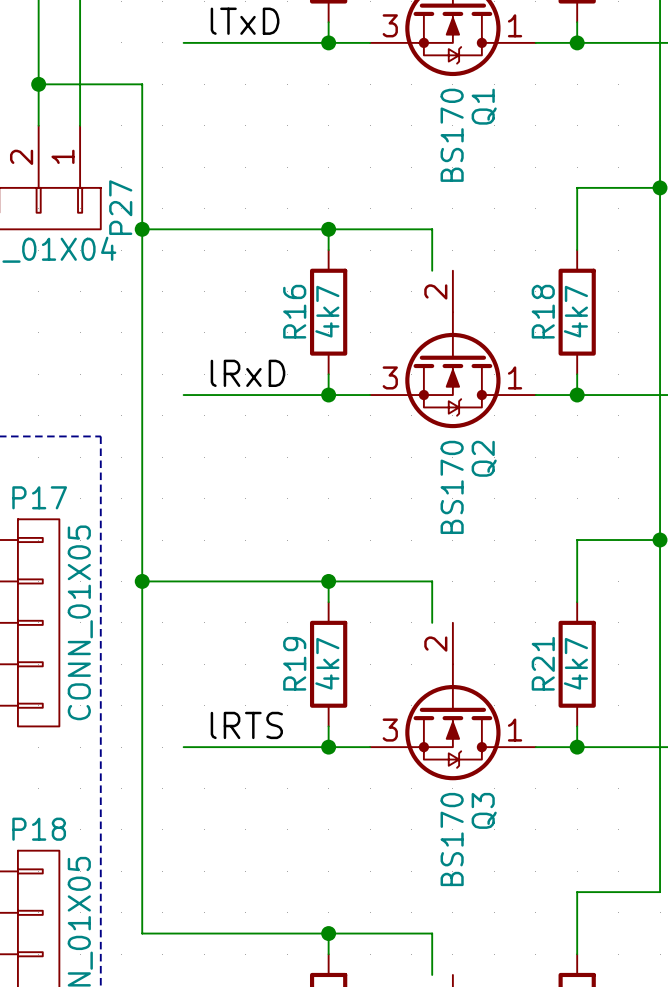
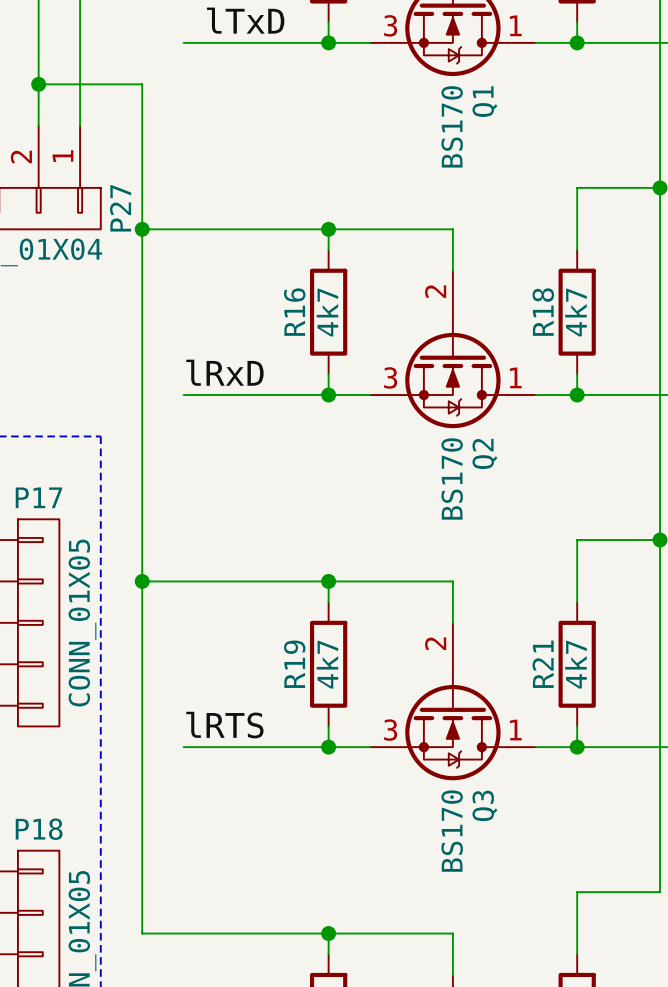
wire: (432, 229) (432, 270) -> (432, 229) (452, 229) (452, 270)
label position: lRxD (248, 373) -> lRxD (224, 372)
wire: (432, 581) (432, 622) -> (432, 581) (452, 581) (452, 622)
label position: lRTS (246, 725) -> lRTS (224, 725)
wire: (432, 933) (432, 974) -> (432, 933) (452, 933) (452, 974)

